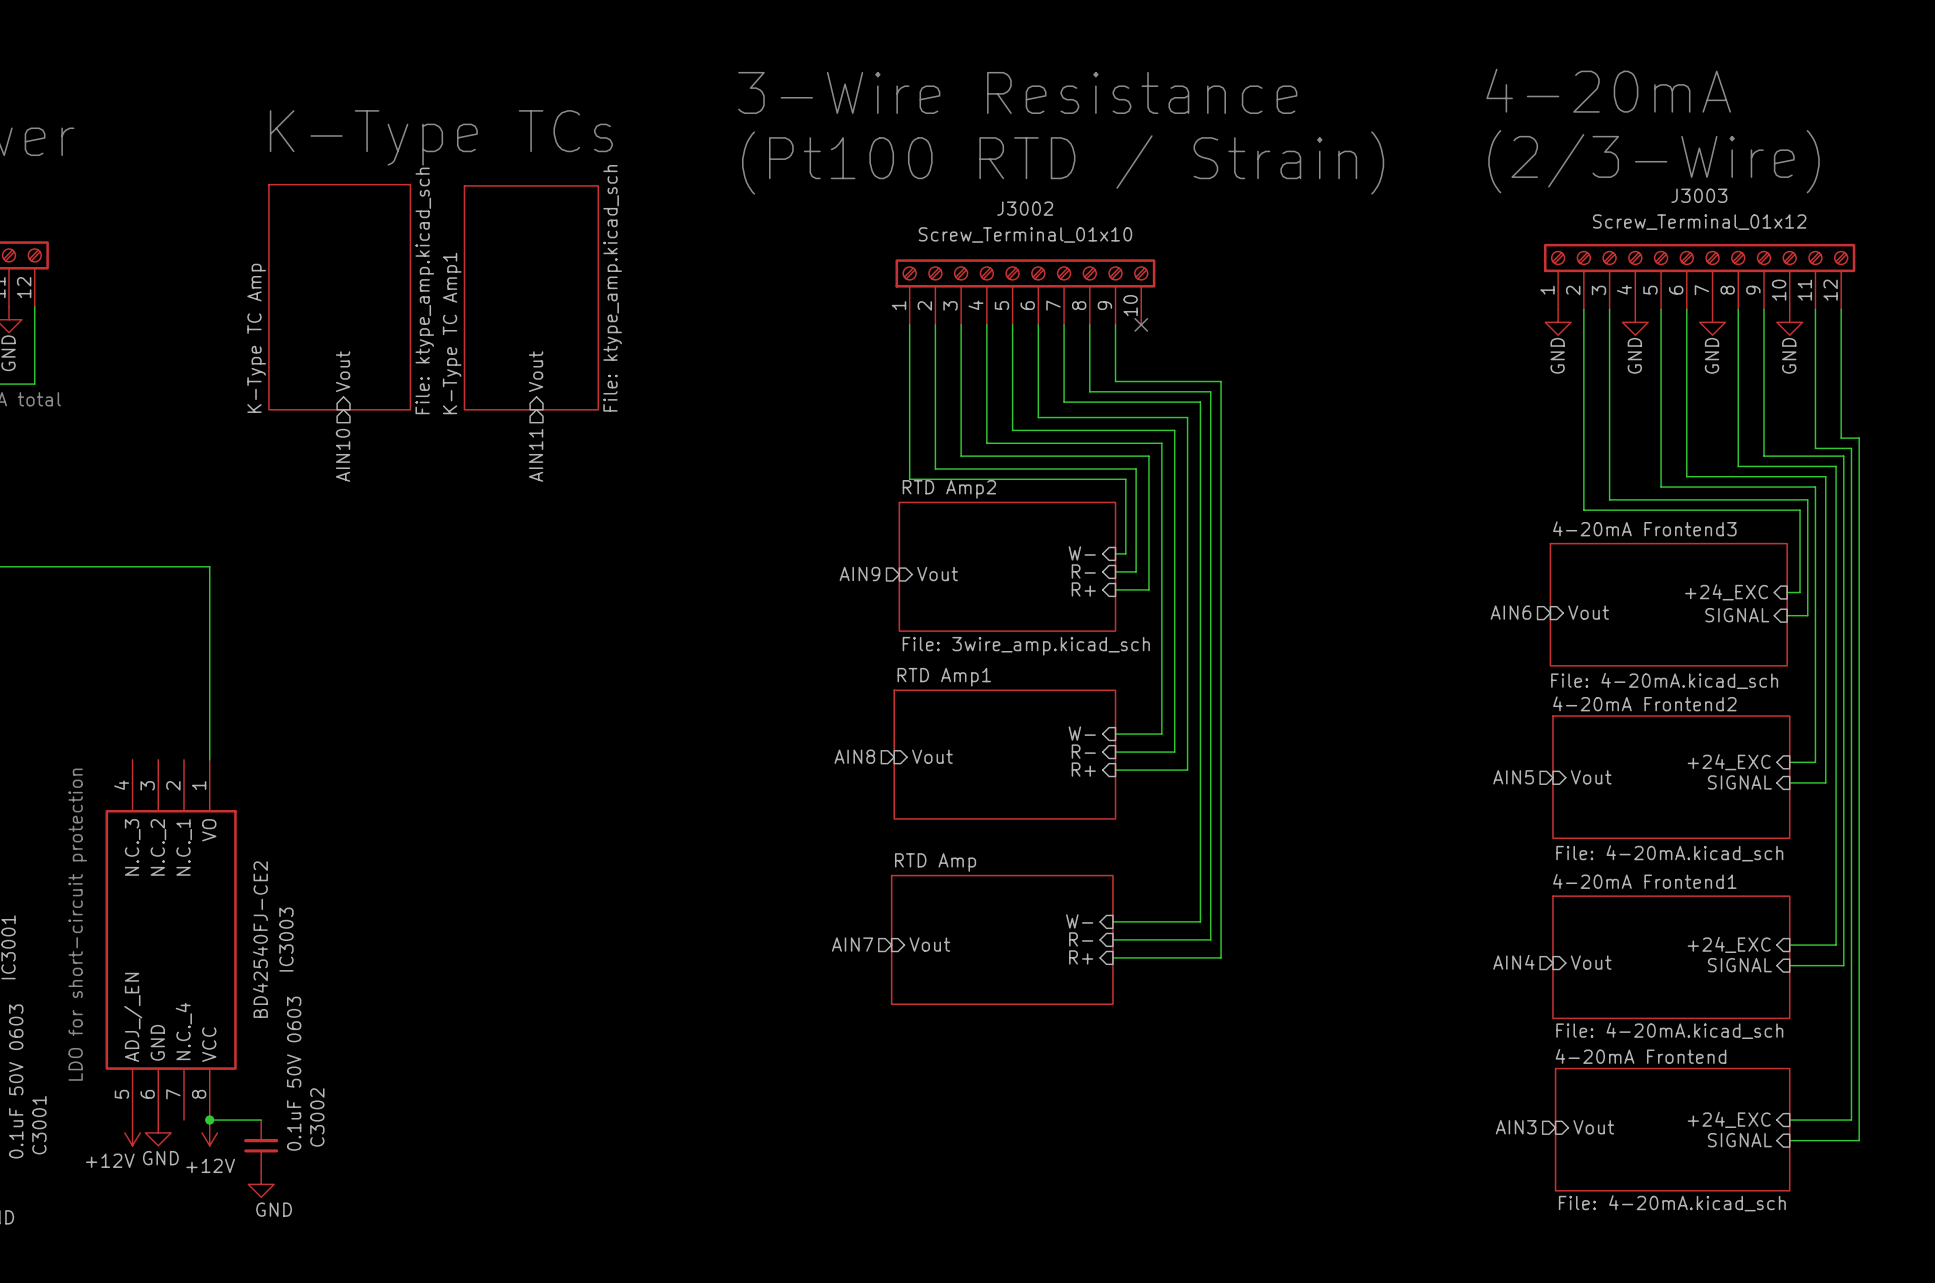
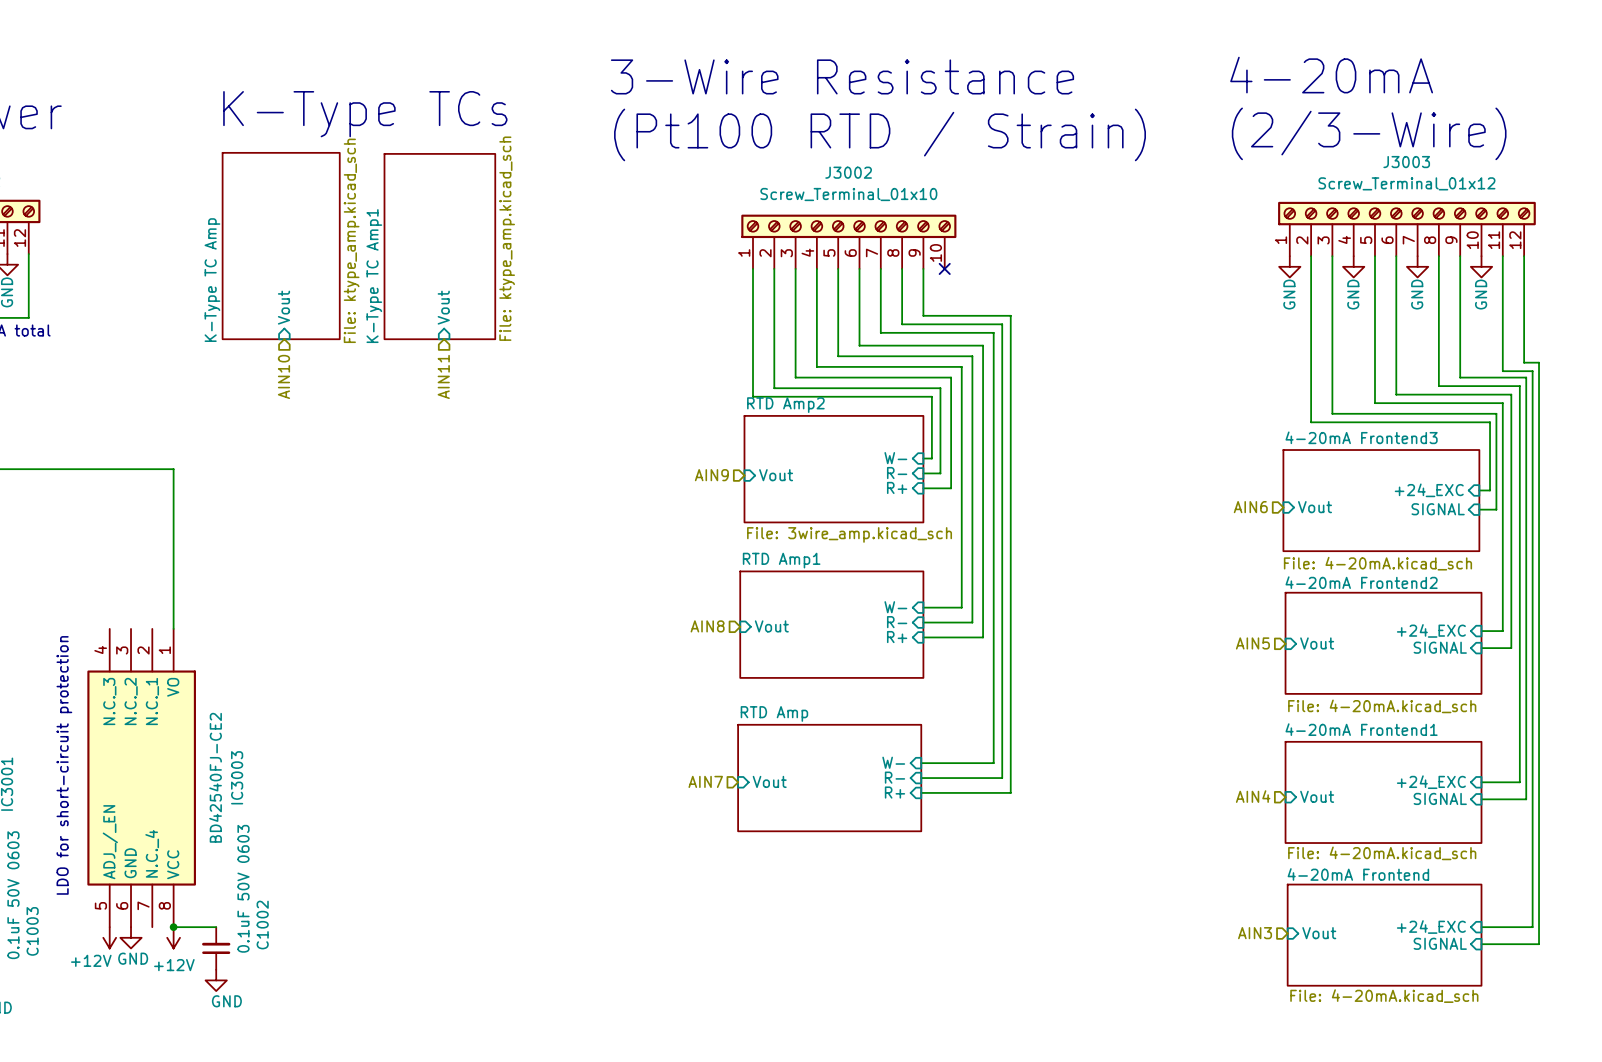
C3002 name: C3002 (317, 1117) -> C1002 (262, 925)
C3001 name: C3001 (39, 1125) -> C1003 (32, 931)

